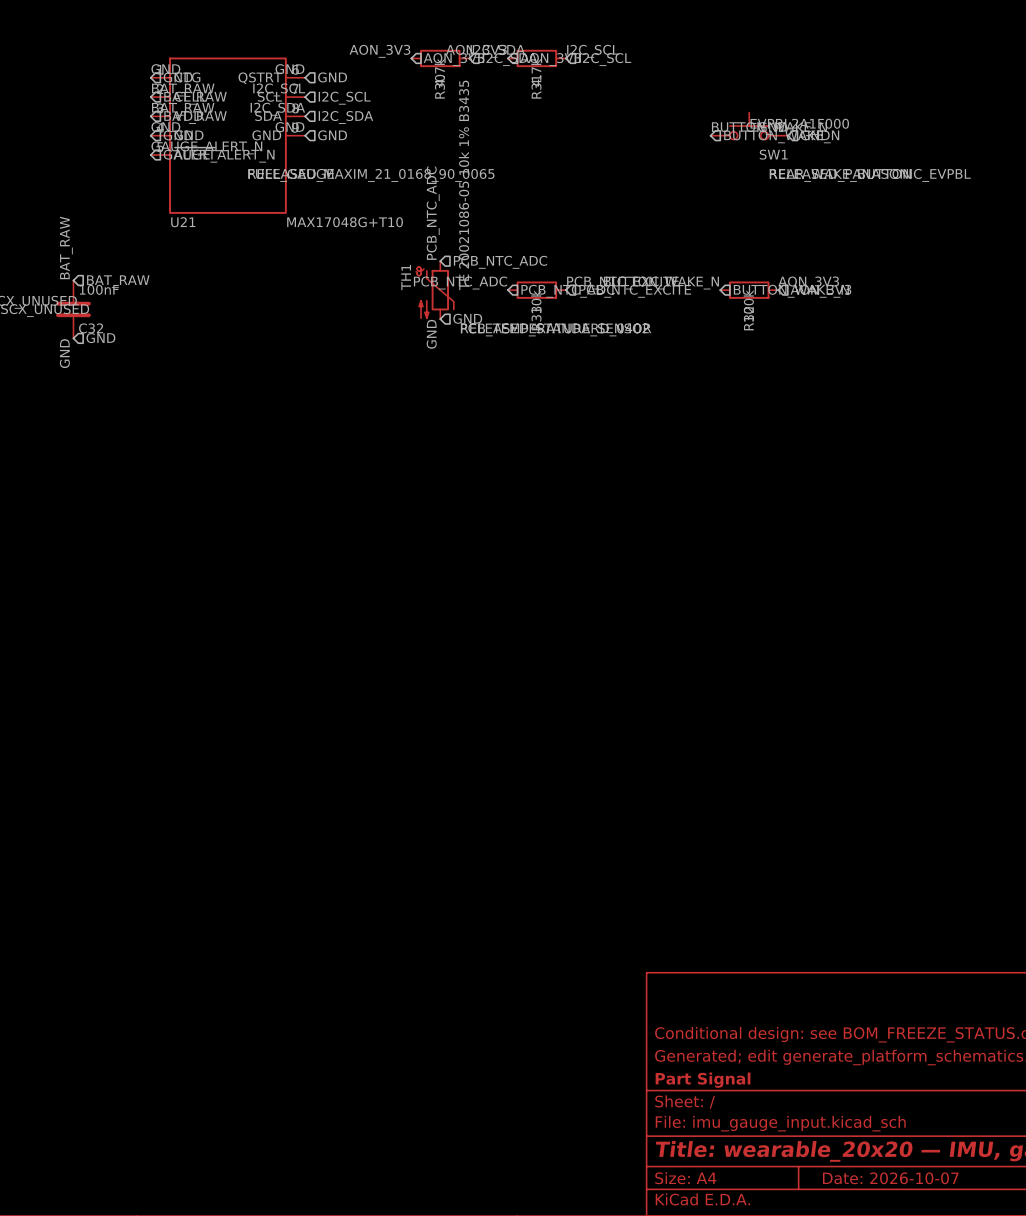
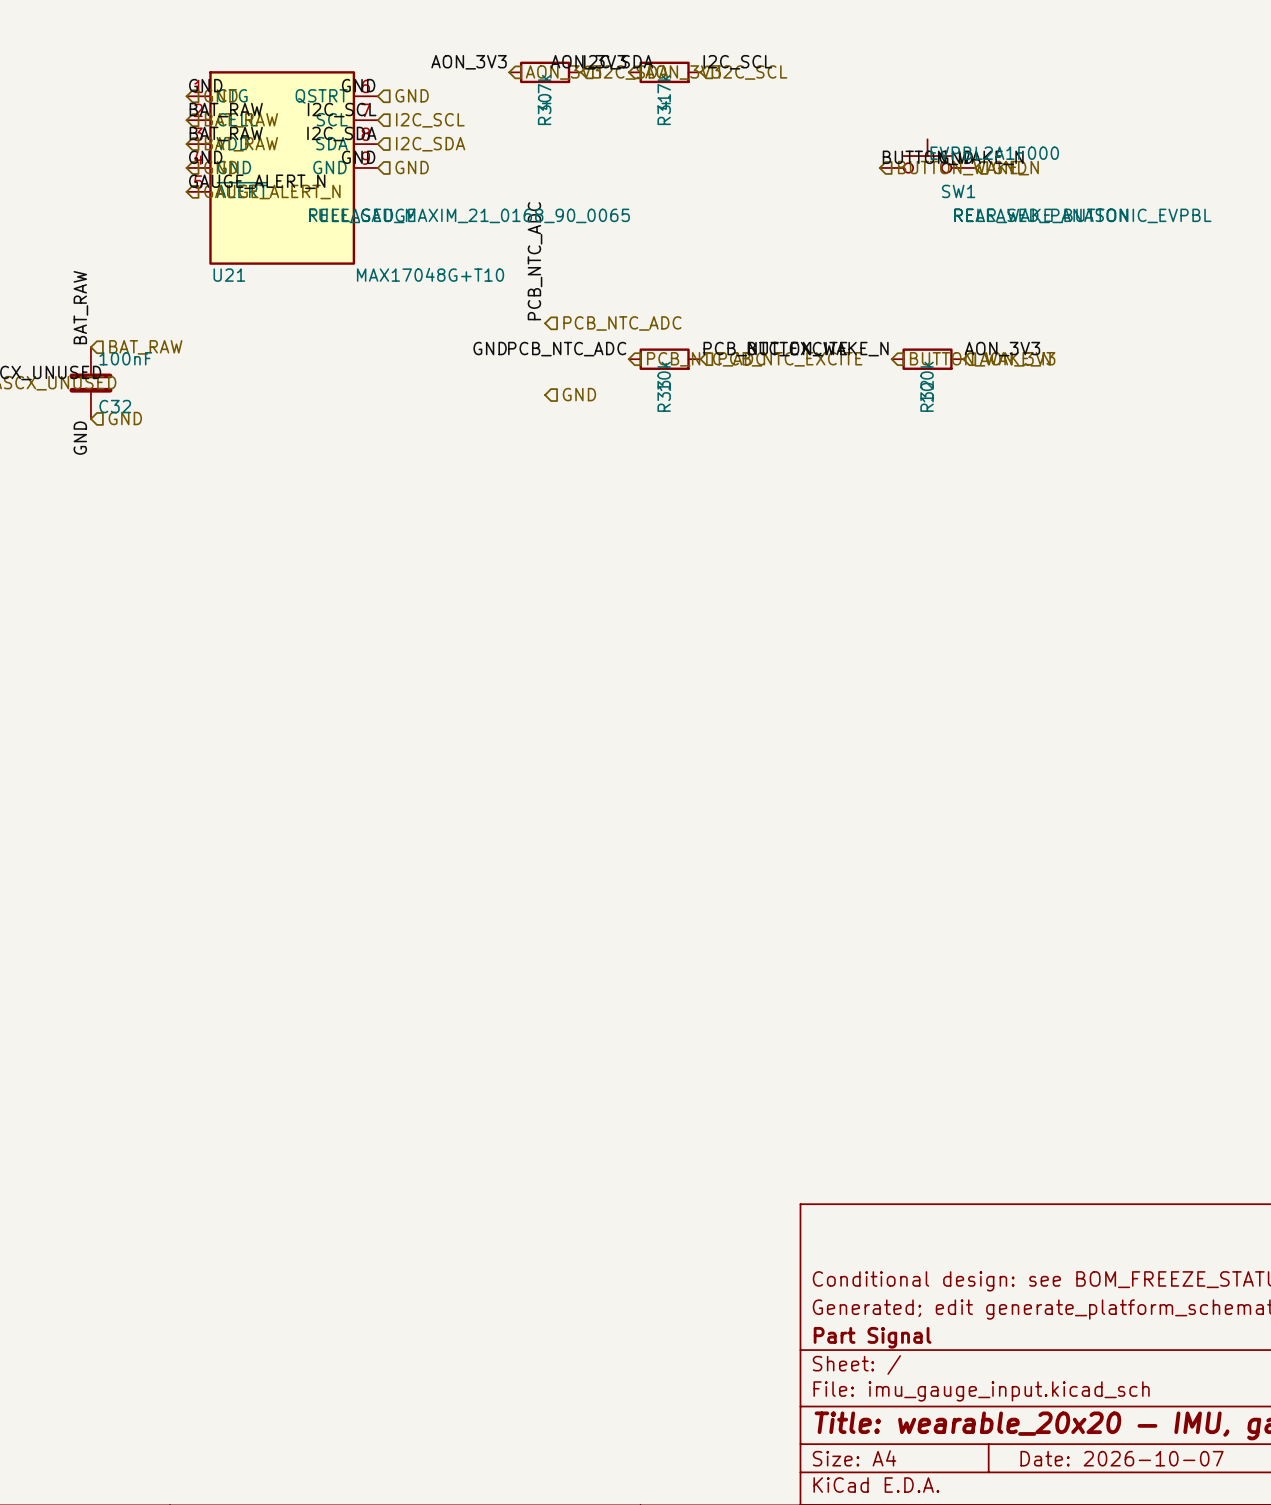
TH1: TE 20021086-05 10k 1% B3435 (435, 290) -> none
label rotation: 0° (431, 334) -> 90° clockwise (490, 348)
label position: GND (431, 334) -> GND (490, 348)

